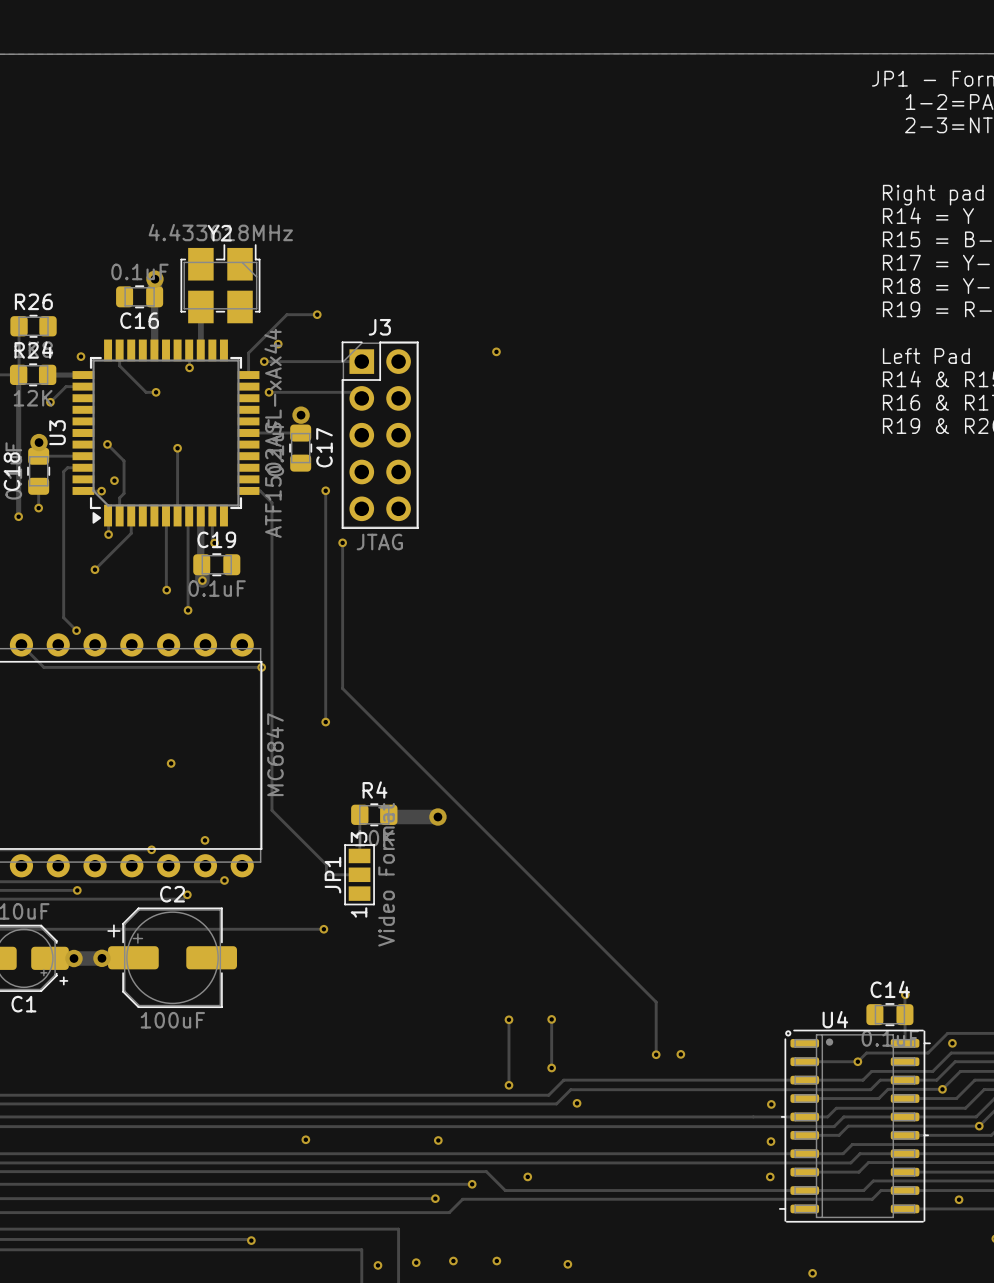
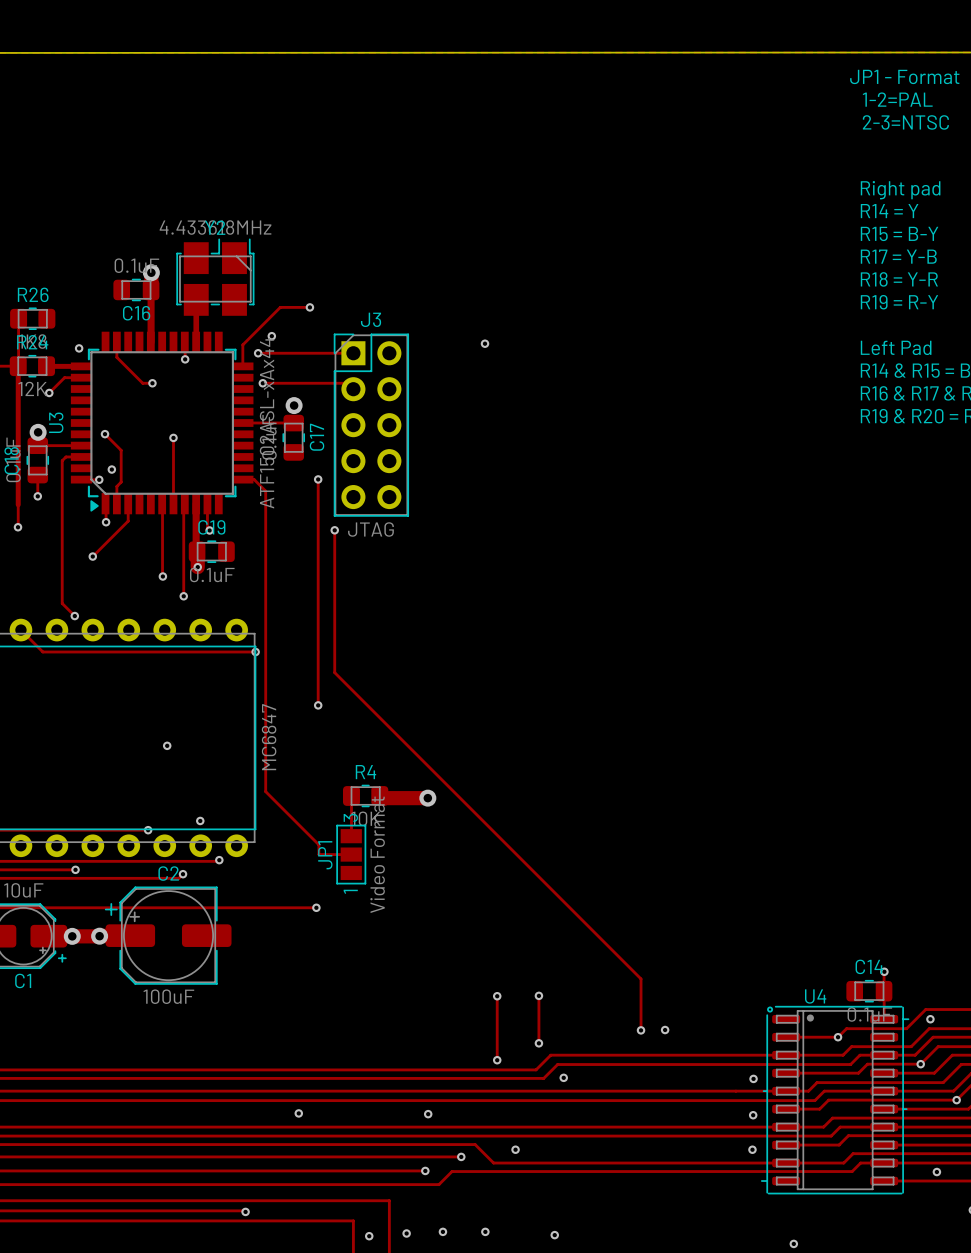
track: none -> (18, 504) (18, 527)
via: (18, 516) -> none
via: none -> (18, 527)

